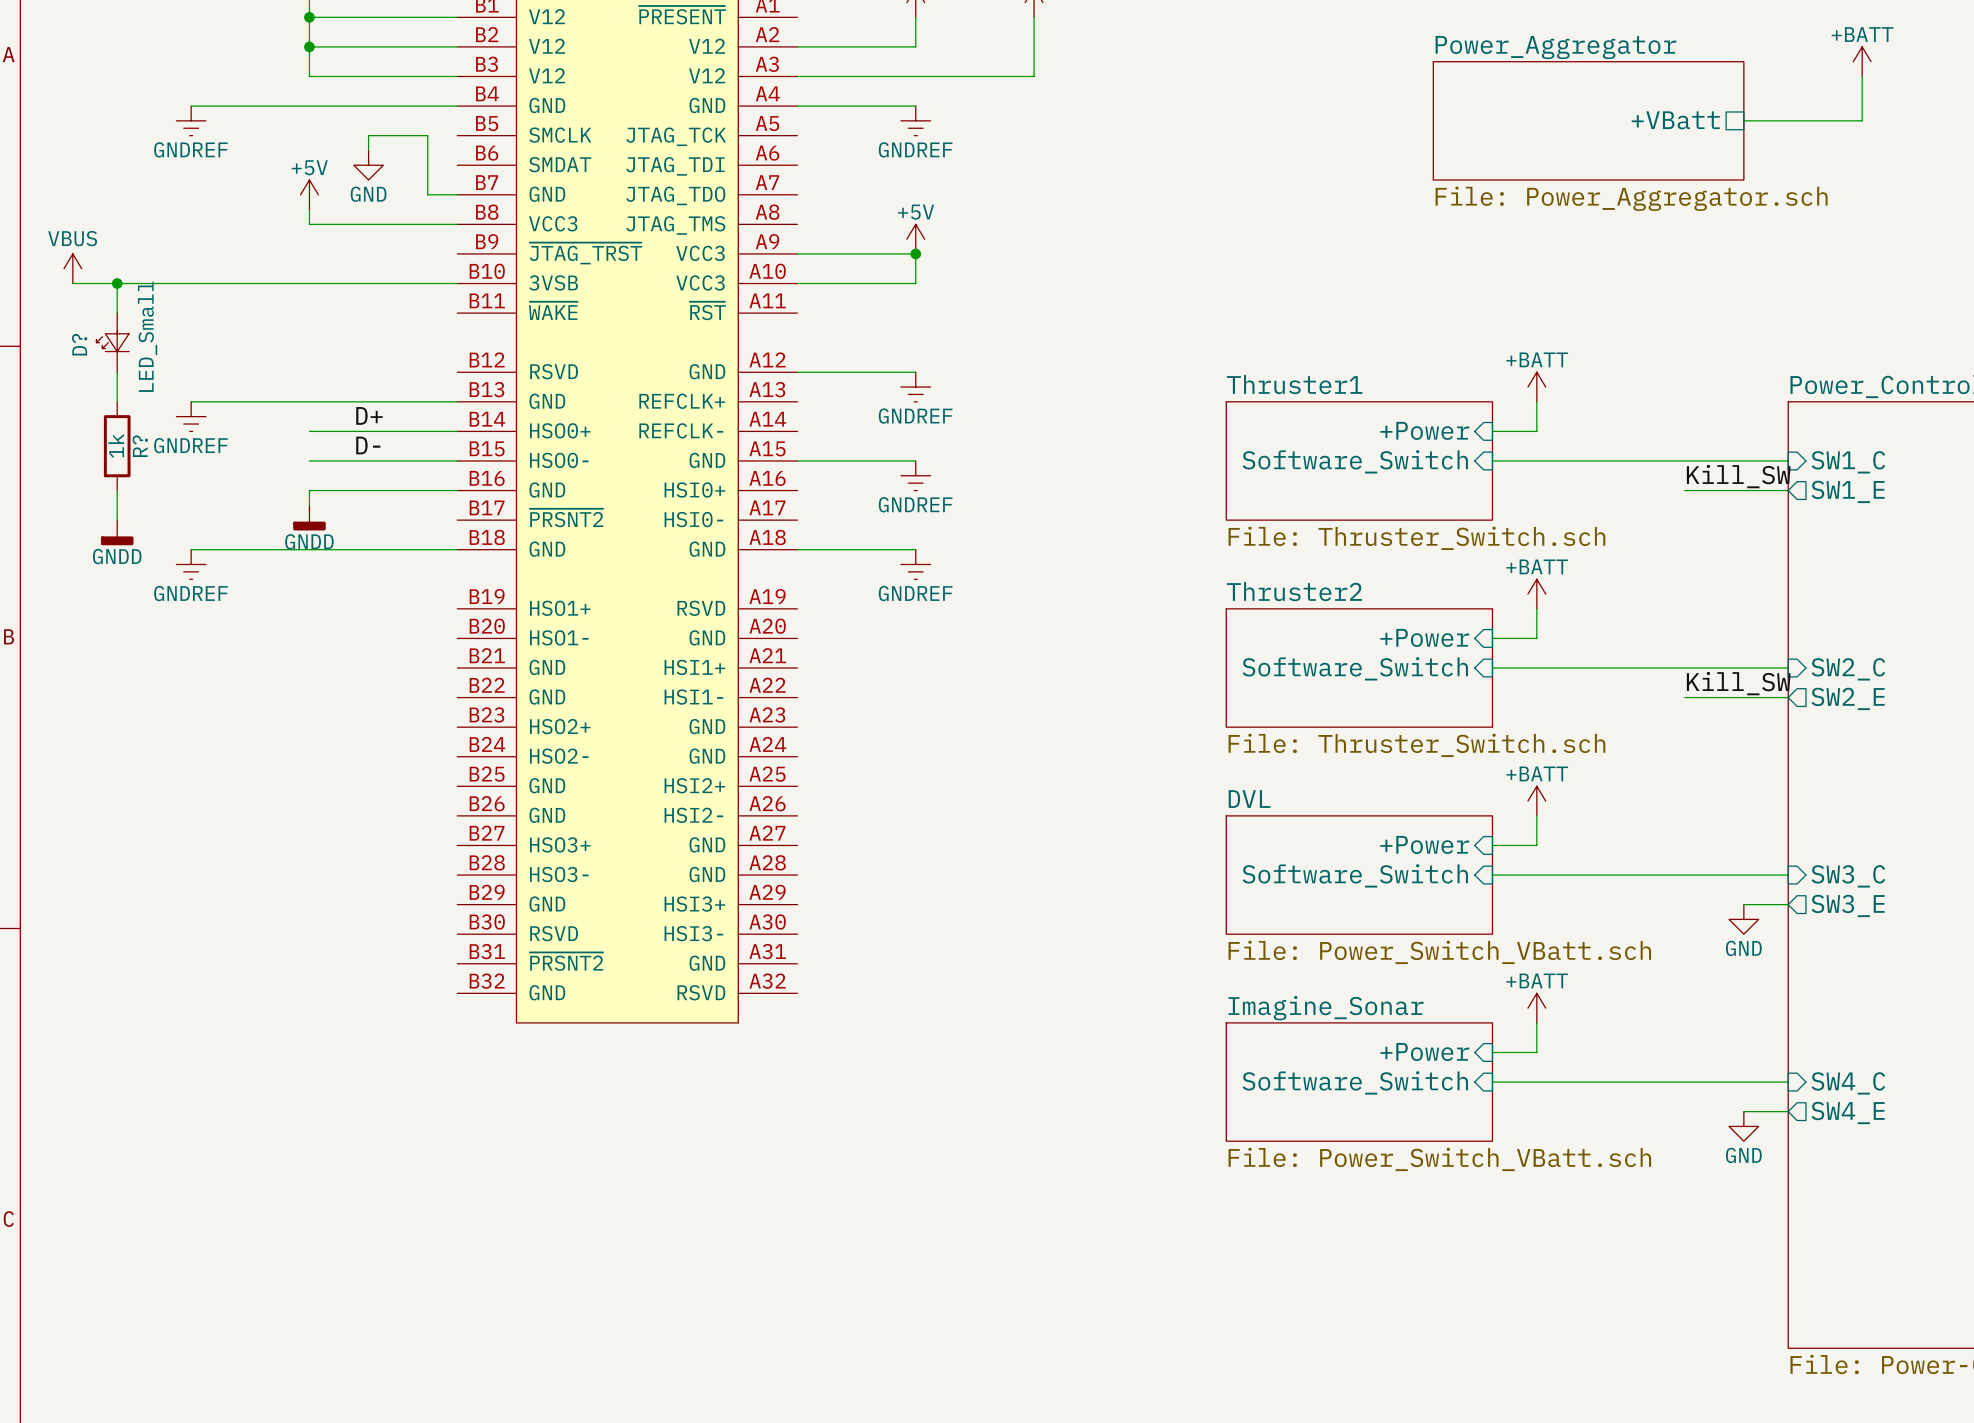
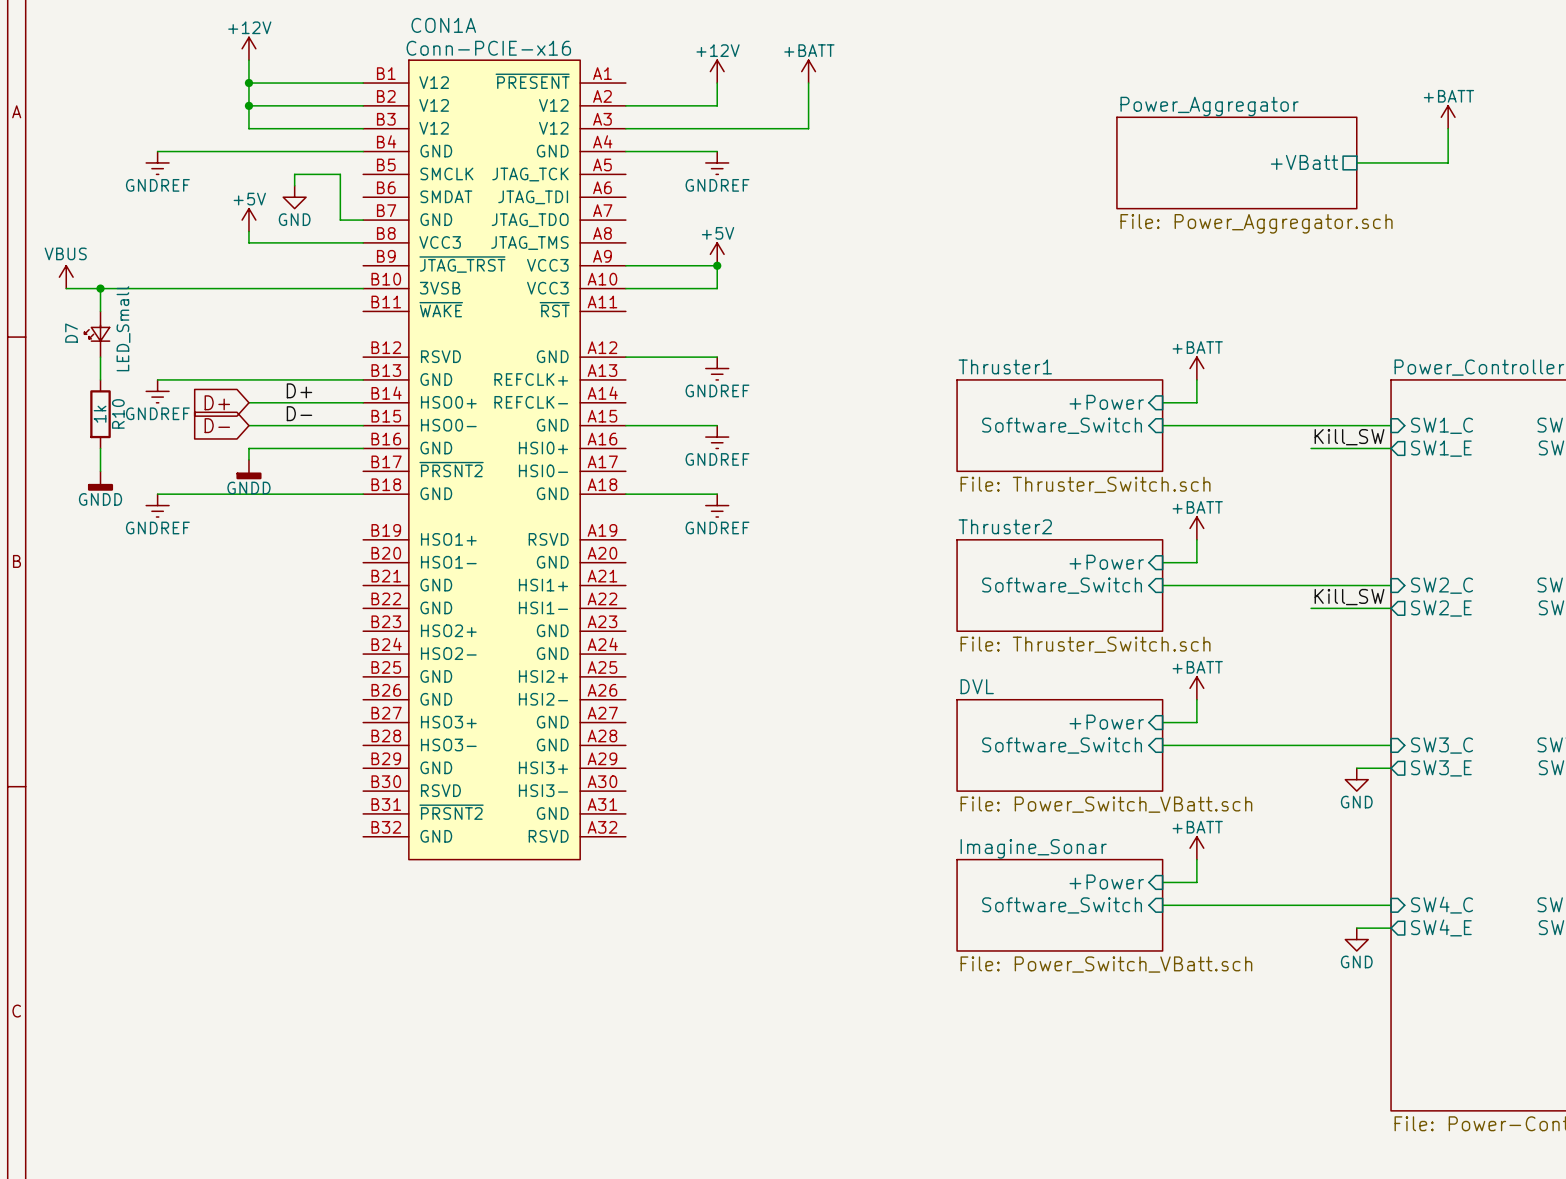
D? name: D? (79, 344) -> D7 (71, 333)
global label: none -> D+ (217, 402)
R? name: R? (140, 446) -> R10 (118, 413)
global label: none -> D- (217, 425)

